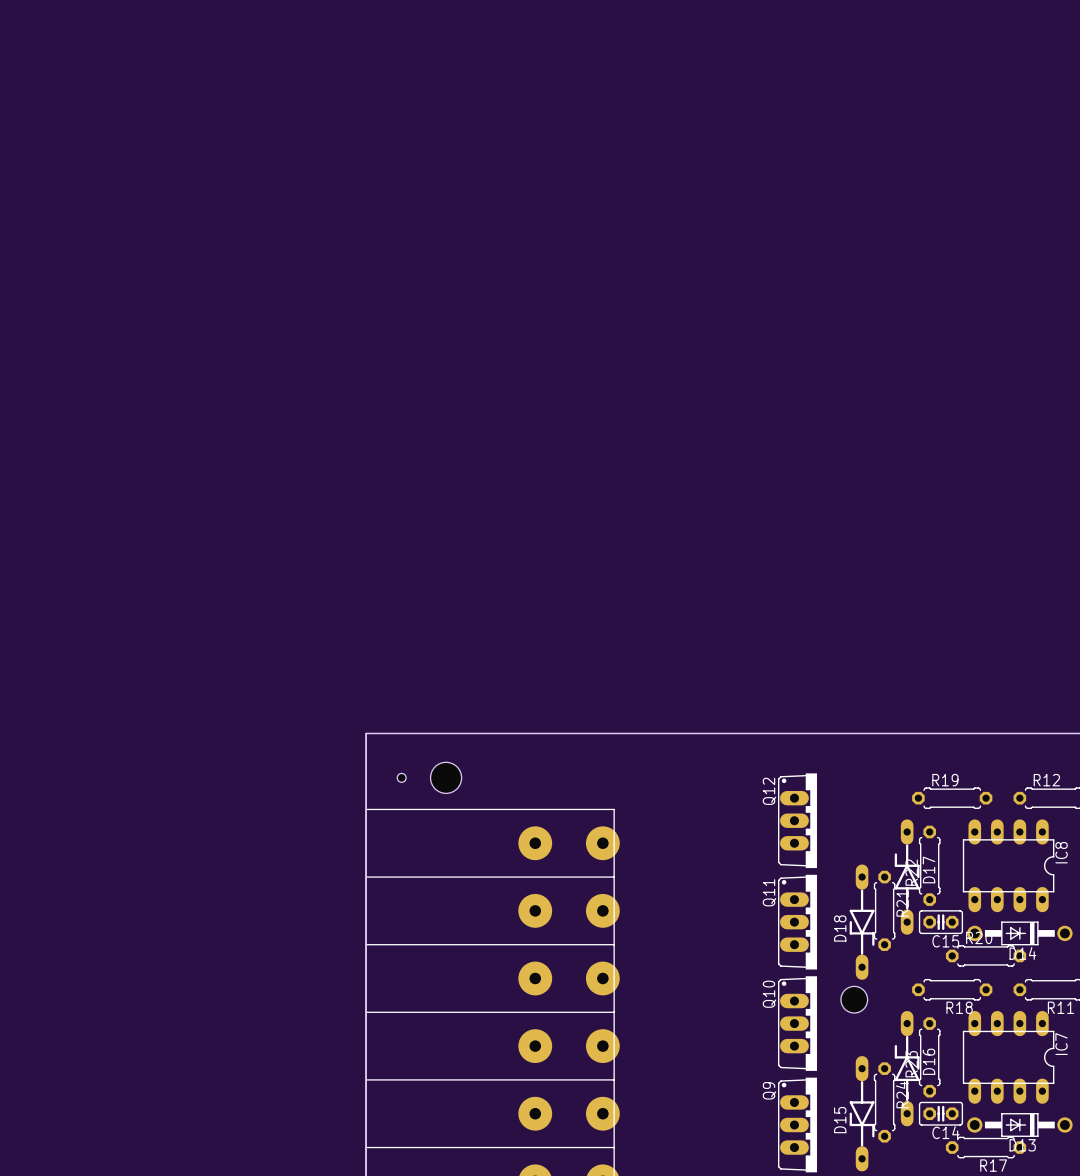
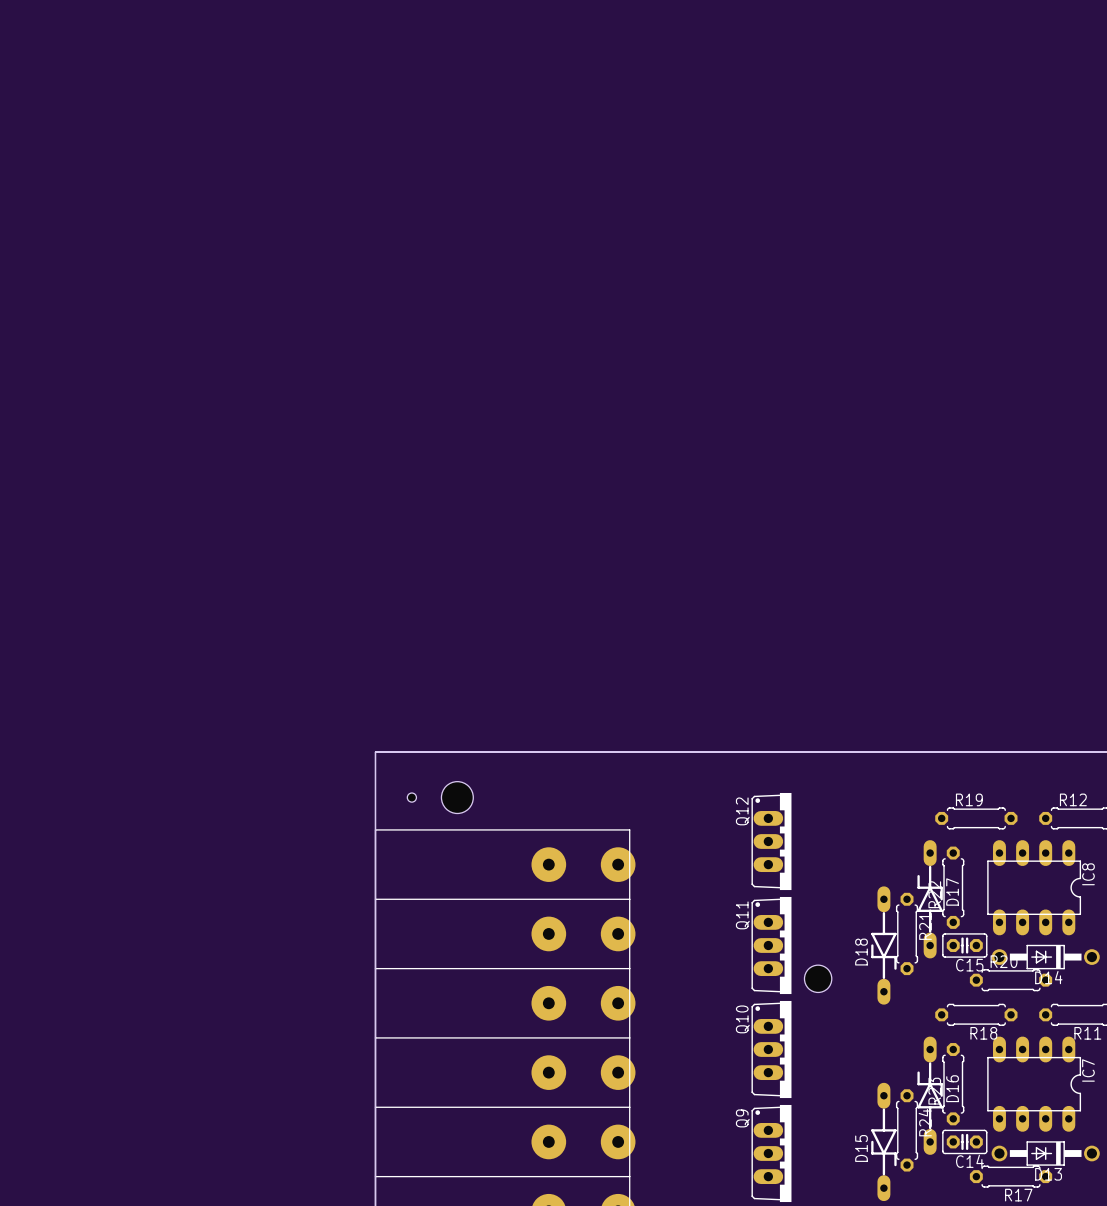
Q12 position: (797, 820) -> (771, 841)
Q11 position: (797, 922) -> (771, 945)
hole position: (854, 999) -> (818, 978)
Q10 position: (797, 1023) -> (771, 1049)
Q9 position: (797, 1125) -> (771, 1153)

